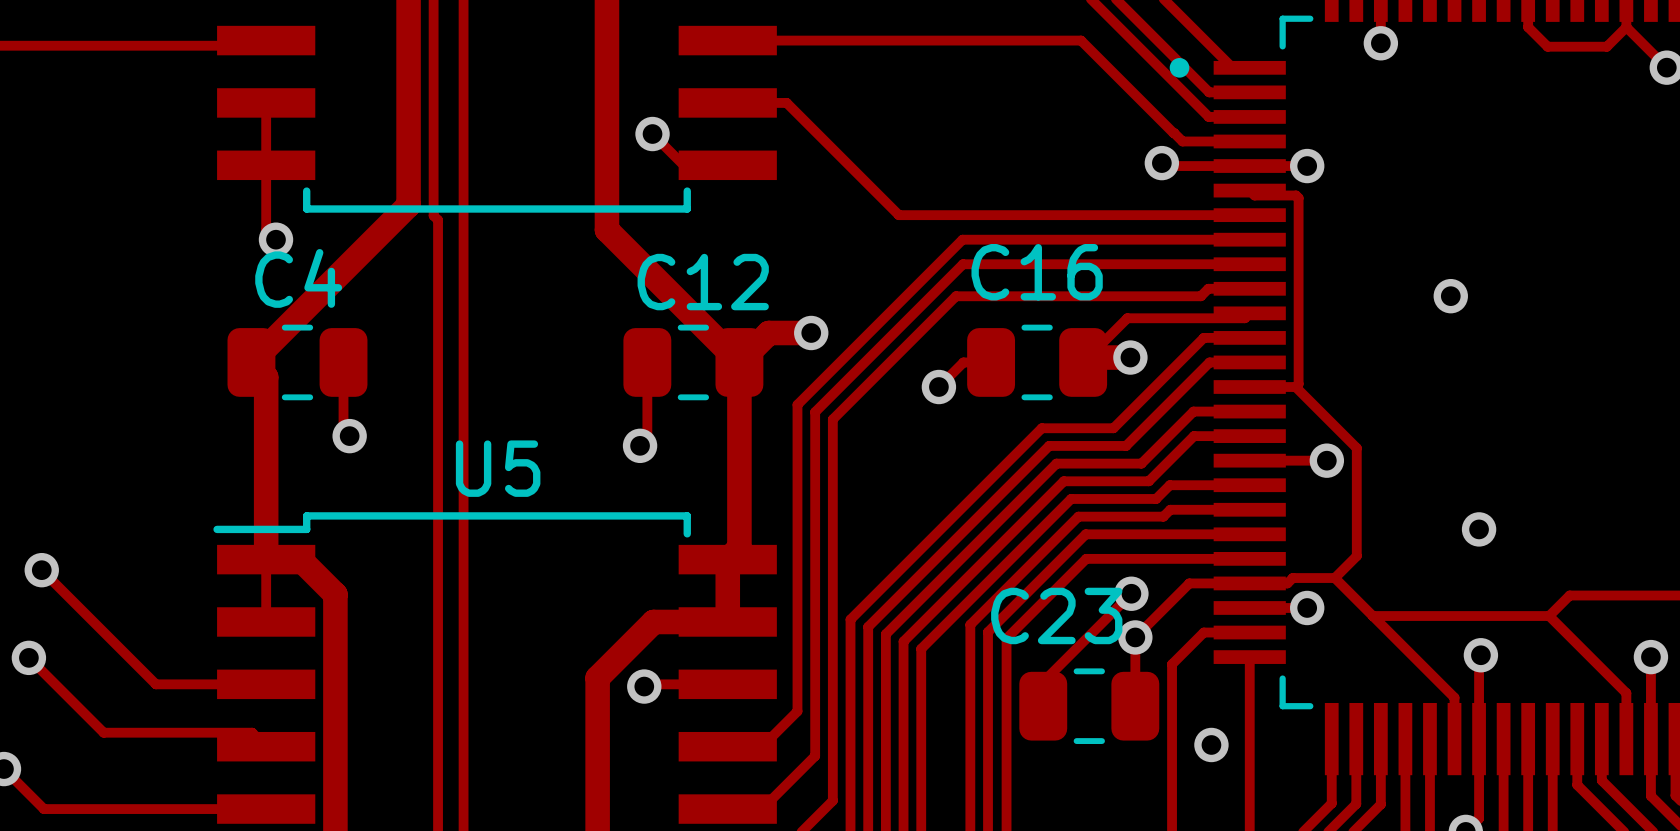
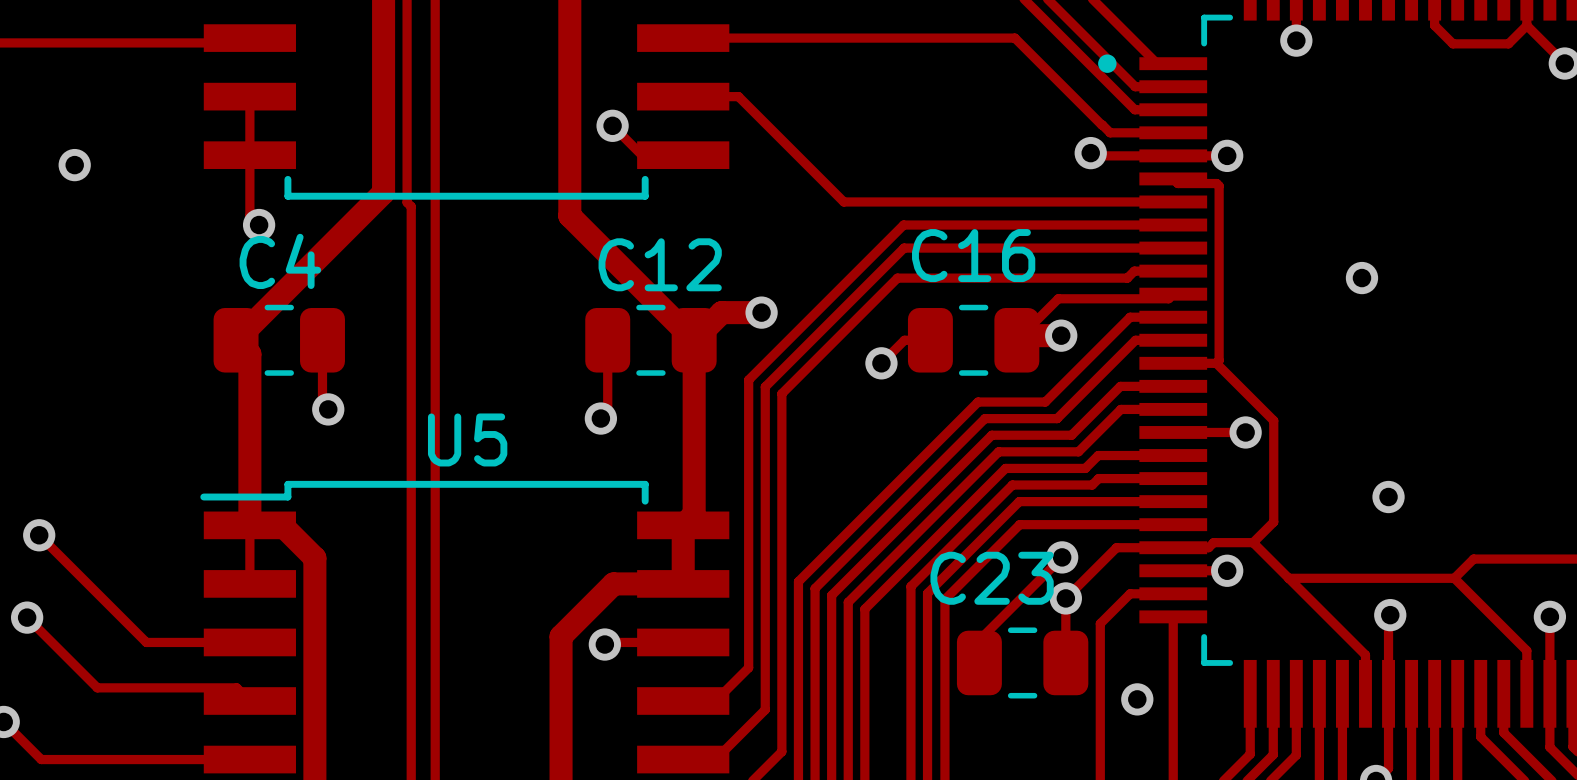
via: none -> (74, 165)

